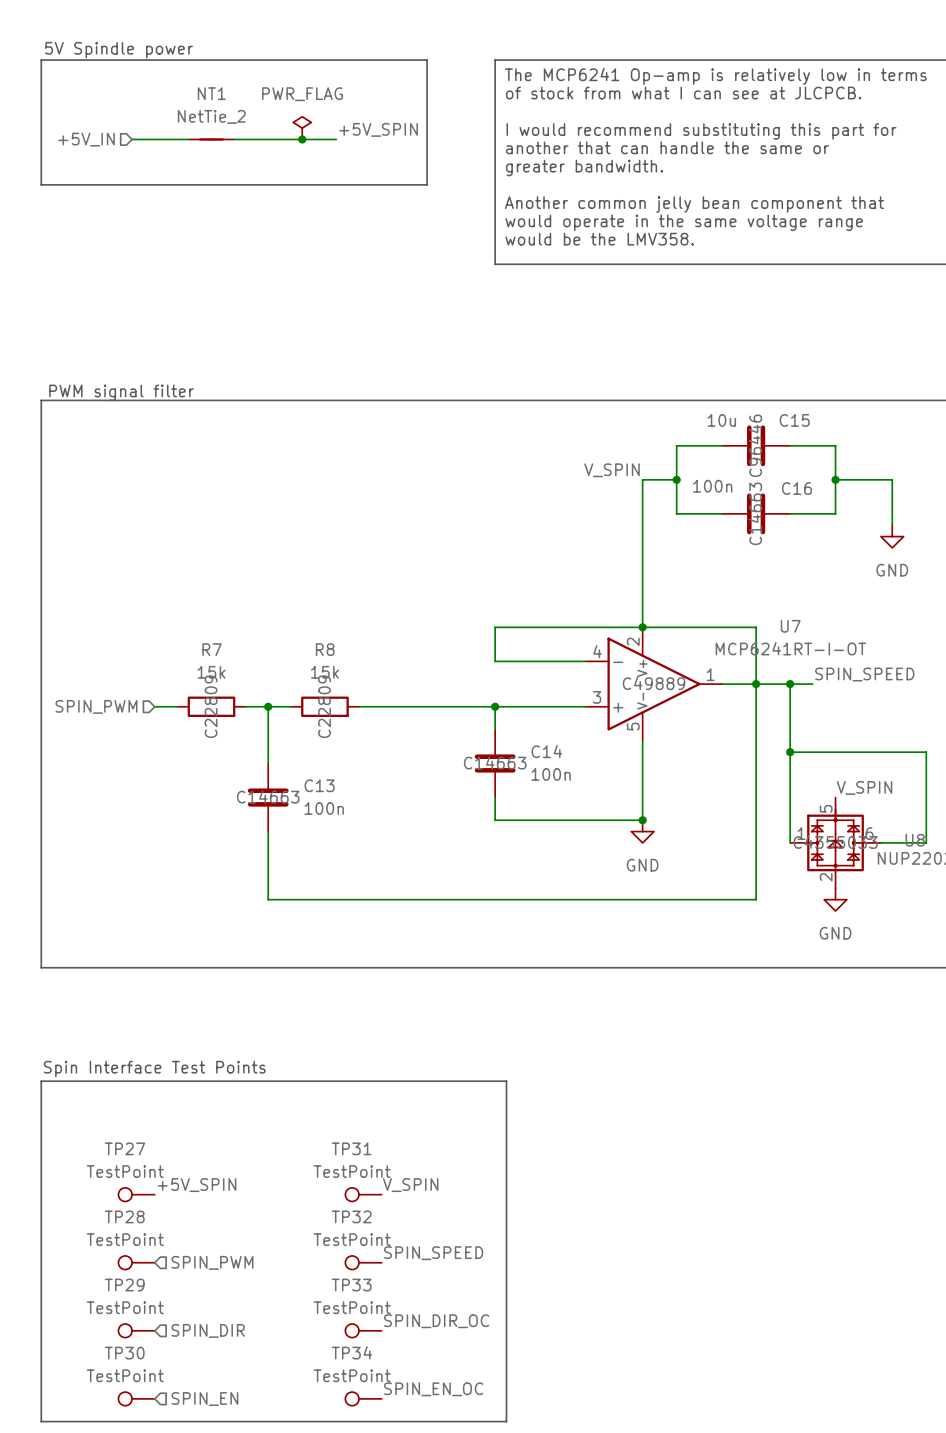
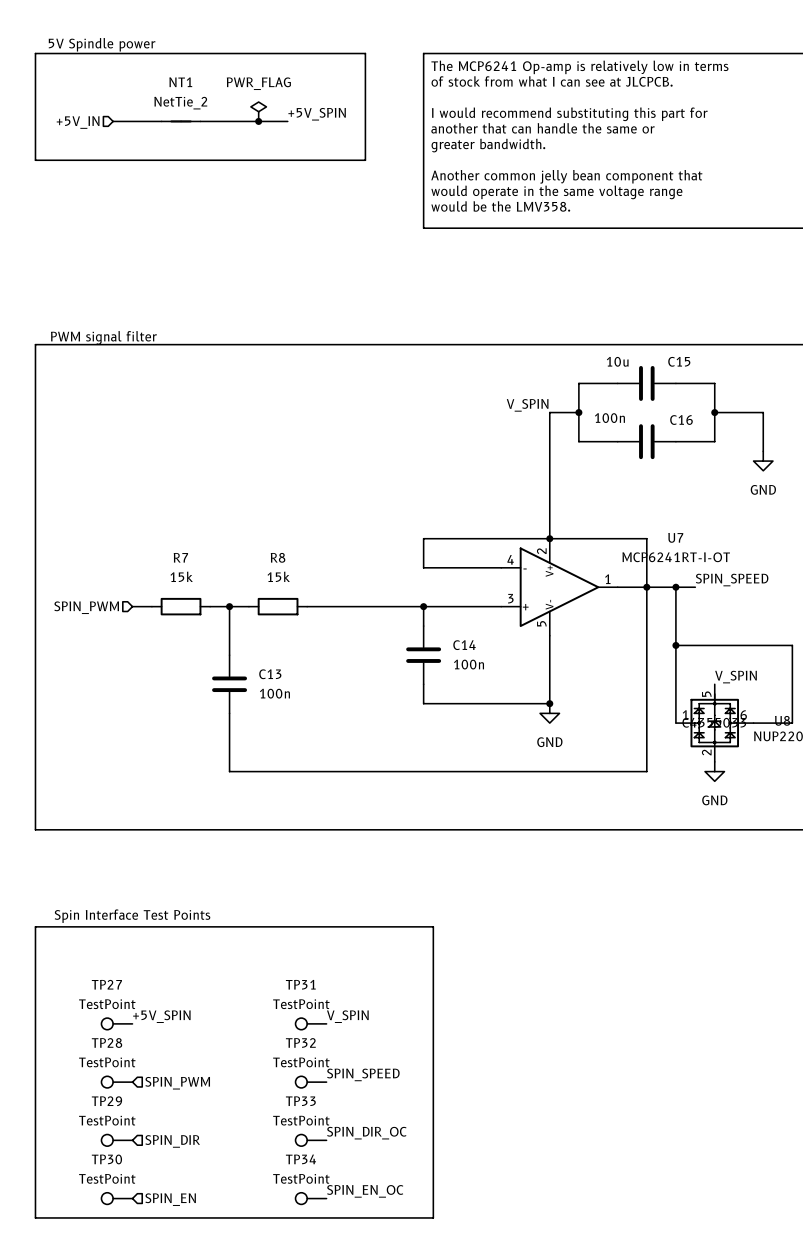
C15 text: C96446 (755, 445) -> none
C16 text: C14663 (755, 513) -> none
U7 text: C49889 (653, 683) -> none
R7 text: C22809 (211, 706) -> none
R8 text: C22809 (324, 706) -> none
C14 text: C14663 (495, 762) -> none
C13 text: C14663 (268, 796) -> none

